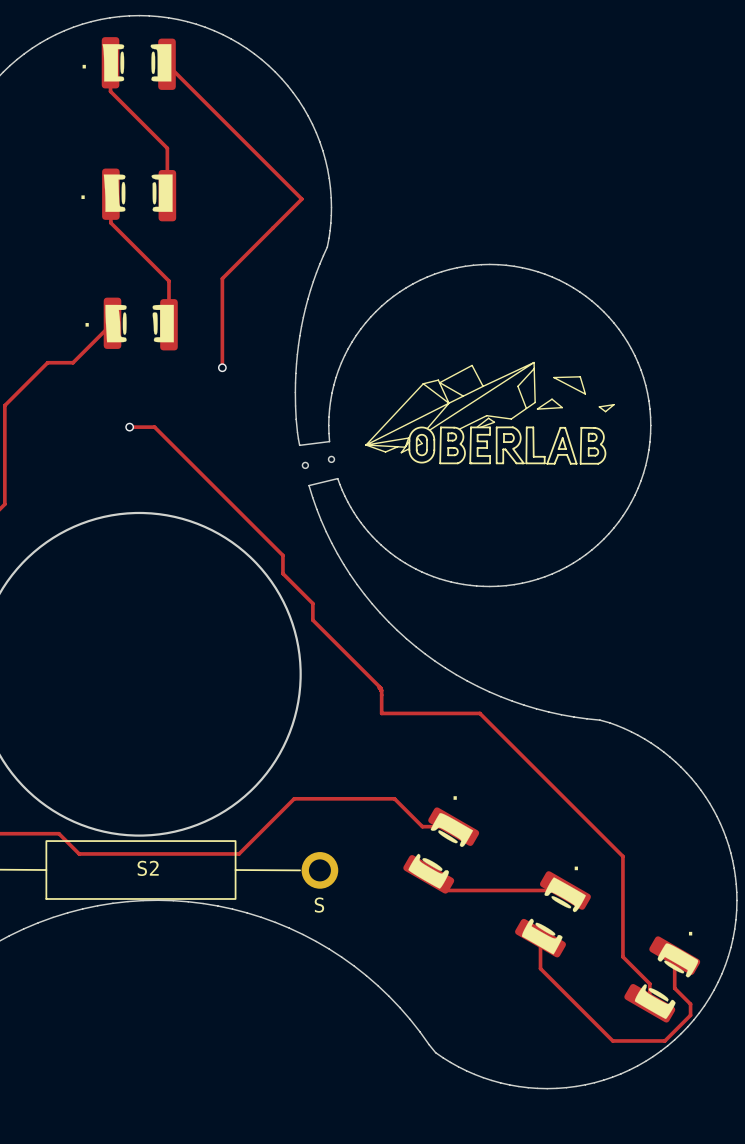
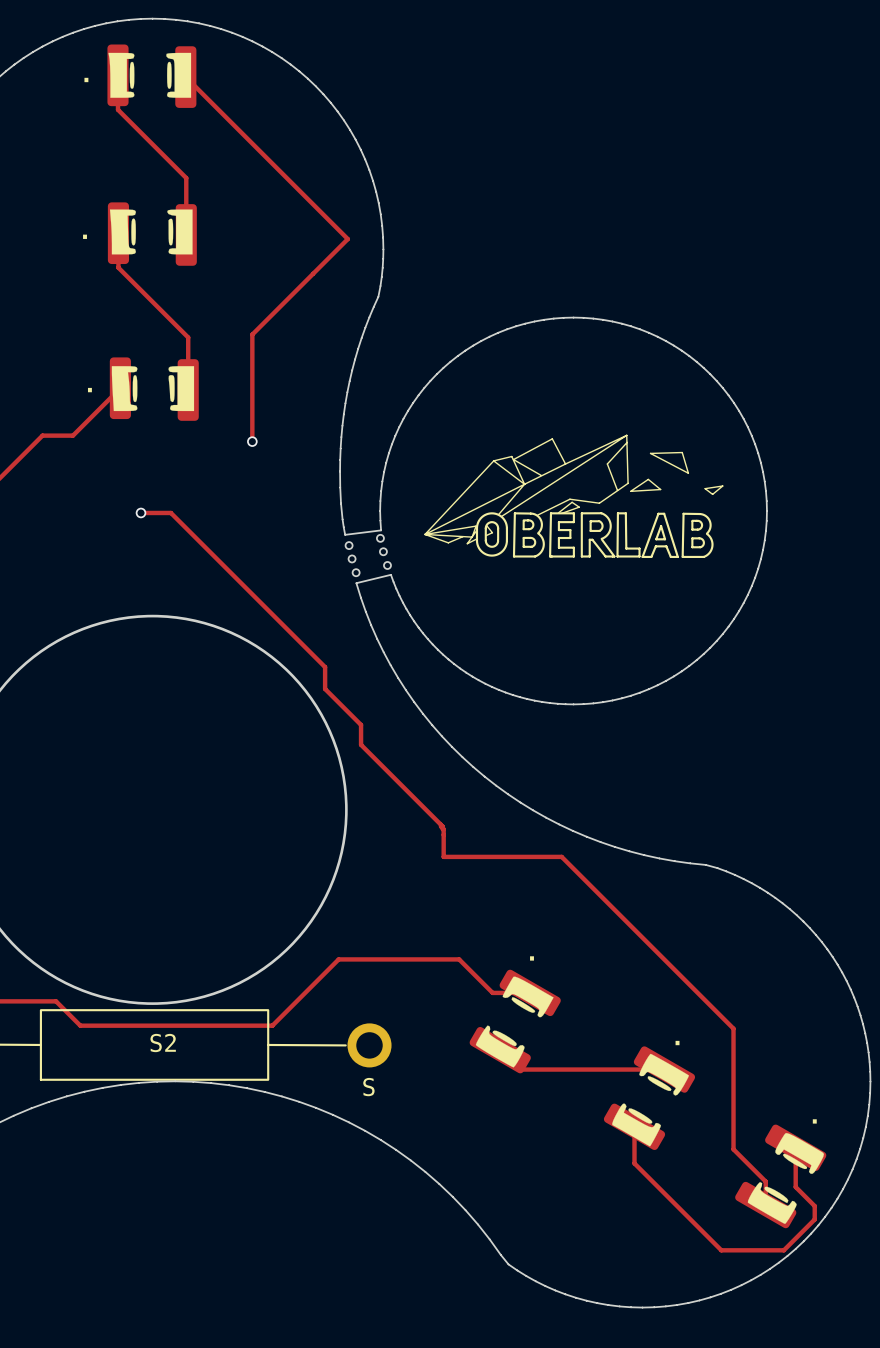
round board edge: none -> [376, 533, 385, 543]
round board edge: none -> [344, 541, 354, 550]
round board edge: none -> [383, 561, 392, 570]
round board edge: none -> [351, 568, 361, 578]

